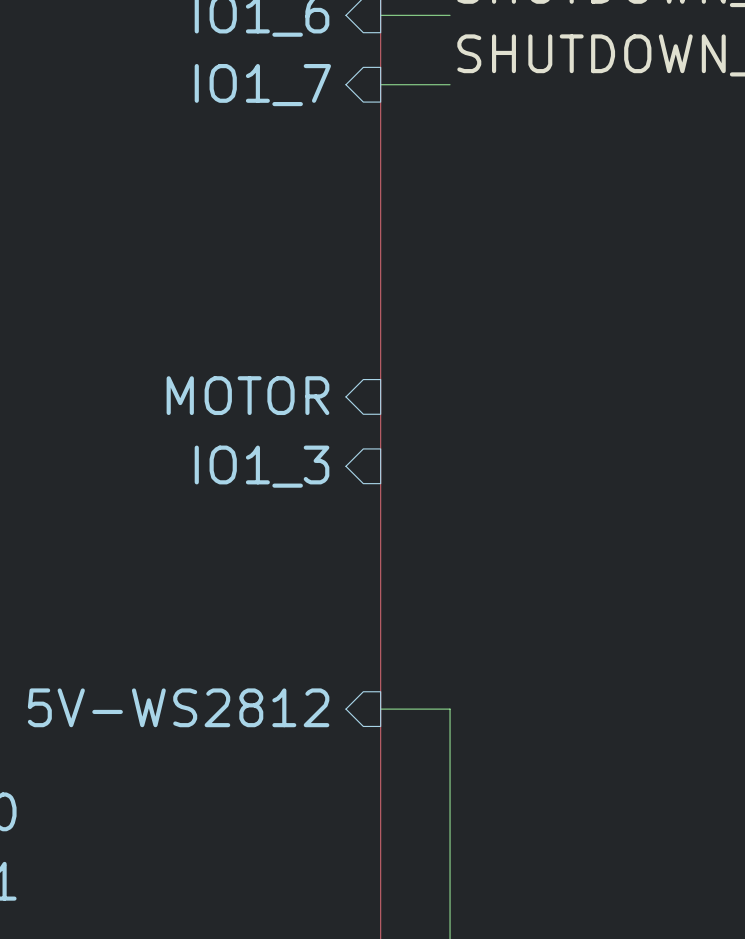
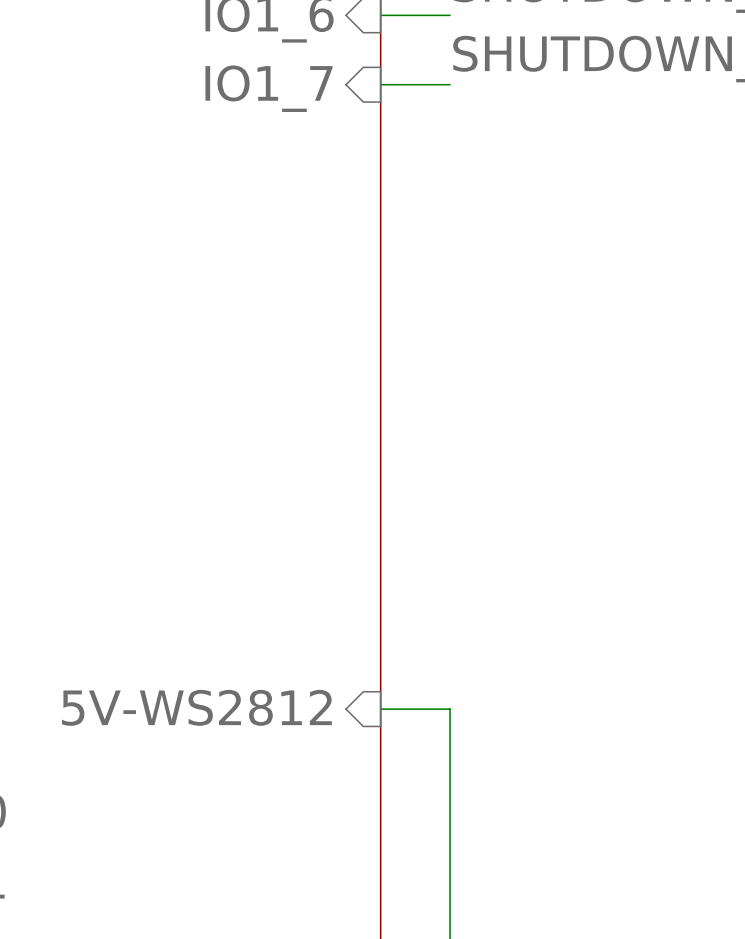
sheet pin: MOTOR (247, 395) -> none
sheet pin: IO1_3 (262, 466) -> none

